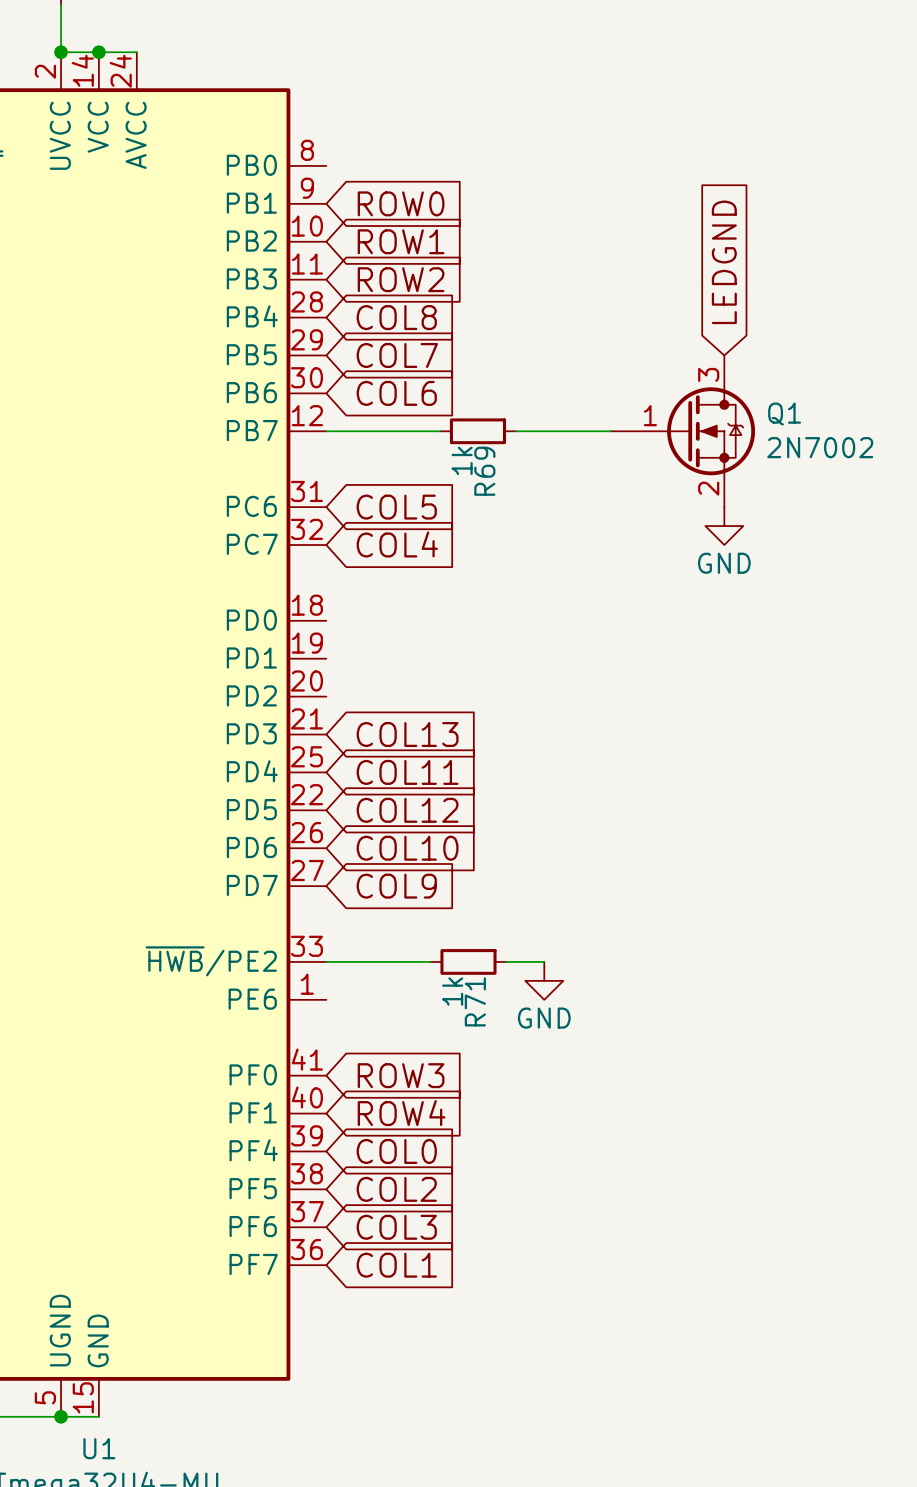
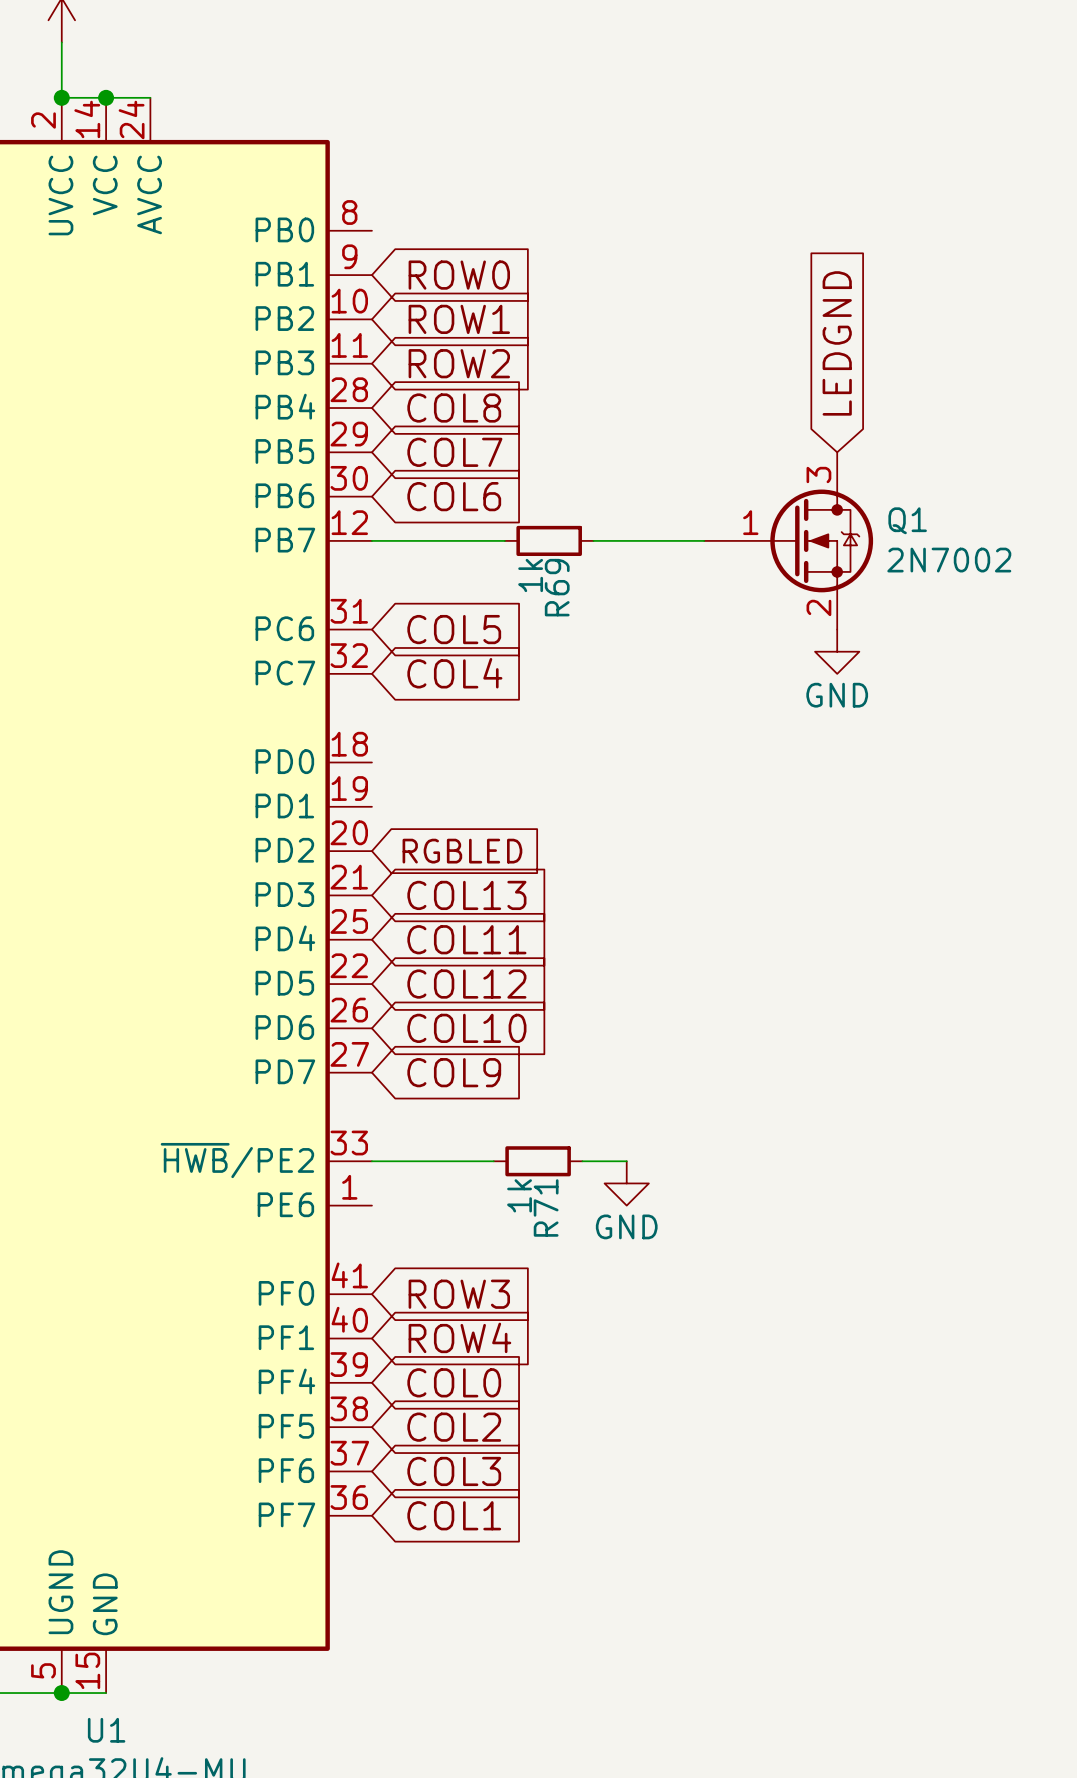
global label: none -> RGBLED (462, 851)

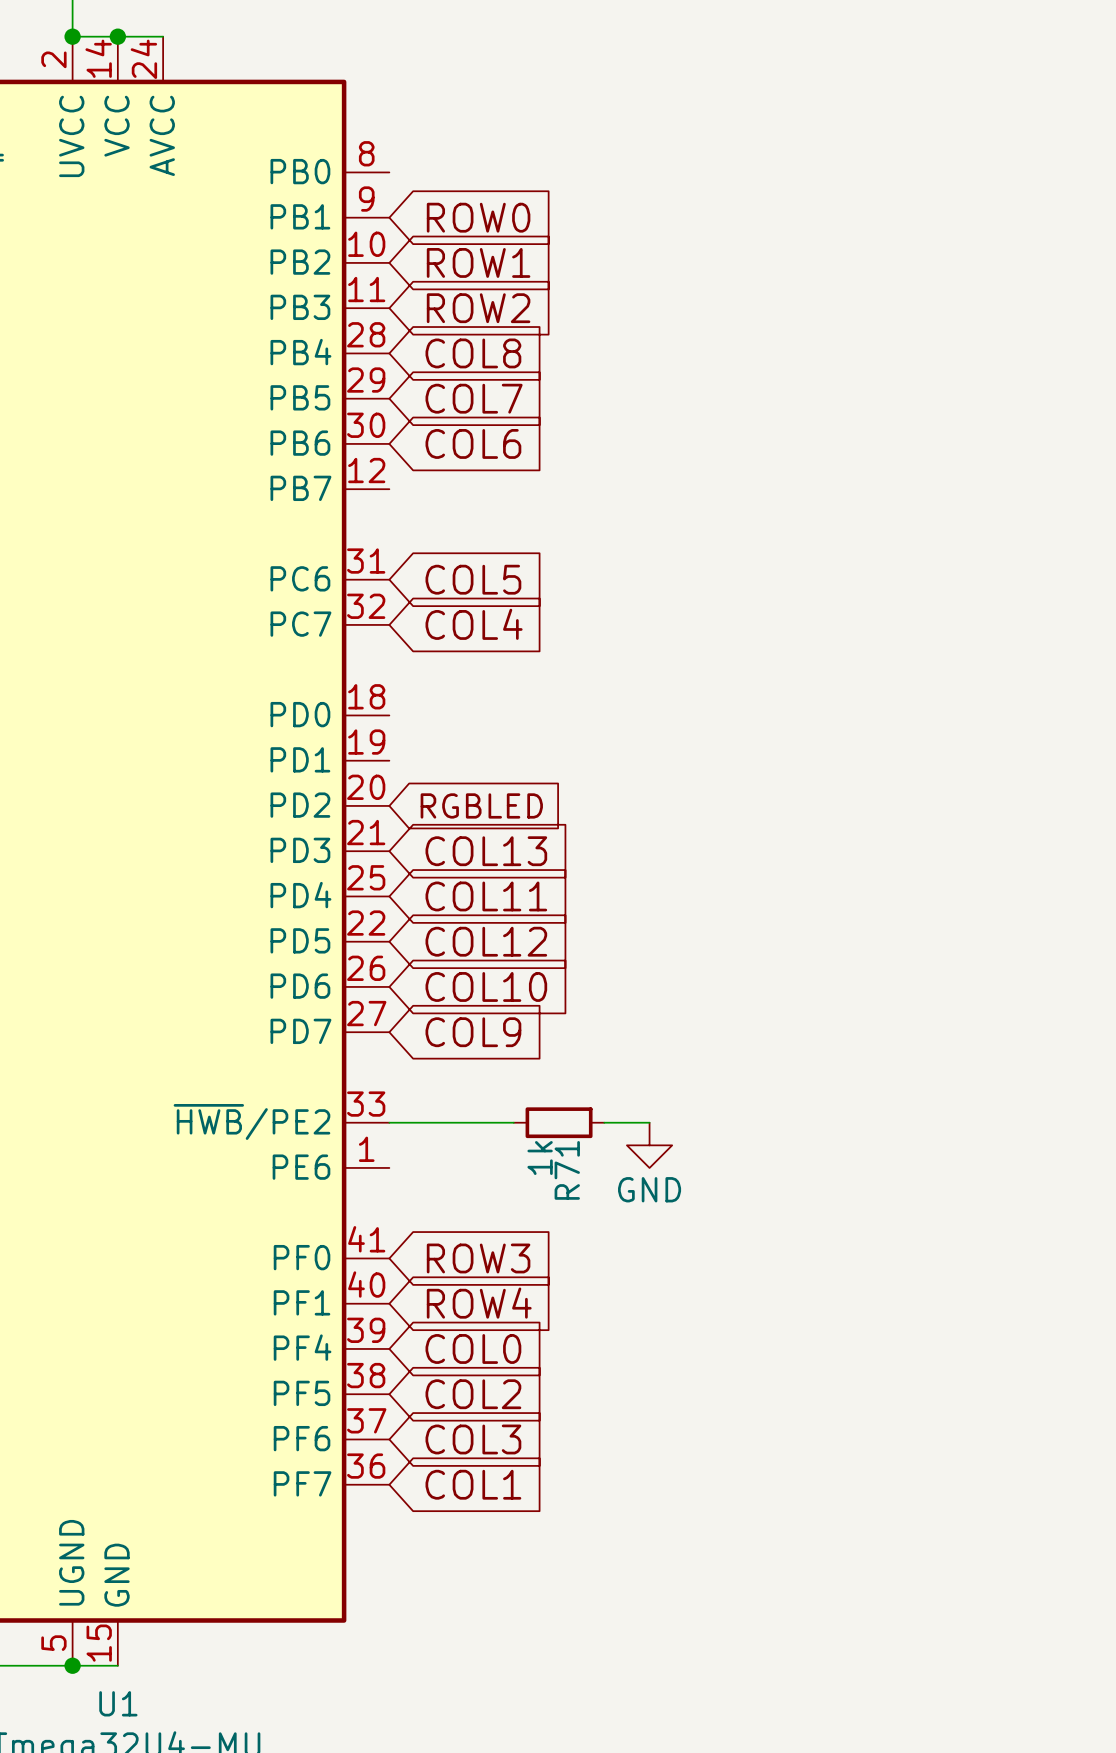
global label: LEDGND (837, 343) -> none
wire: (371, 540) (504, 540) -> none
R69: 1k (549, 540) -> none
wire: (593, 540) (704, 540) -> none
Q1: 2N7002 (788, 540) -> none
power symbol: GND (837, 651) -> none

